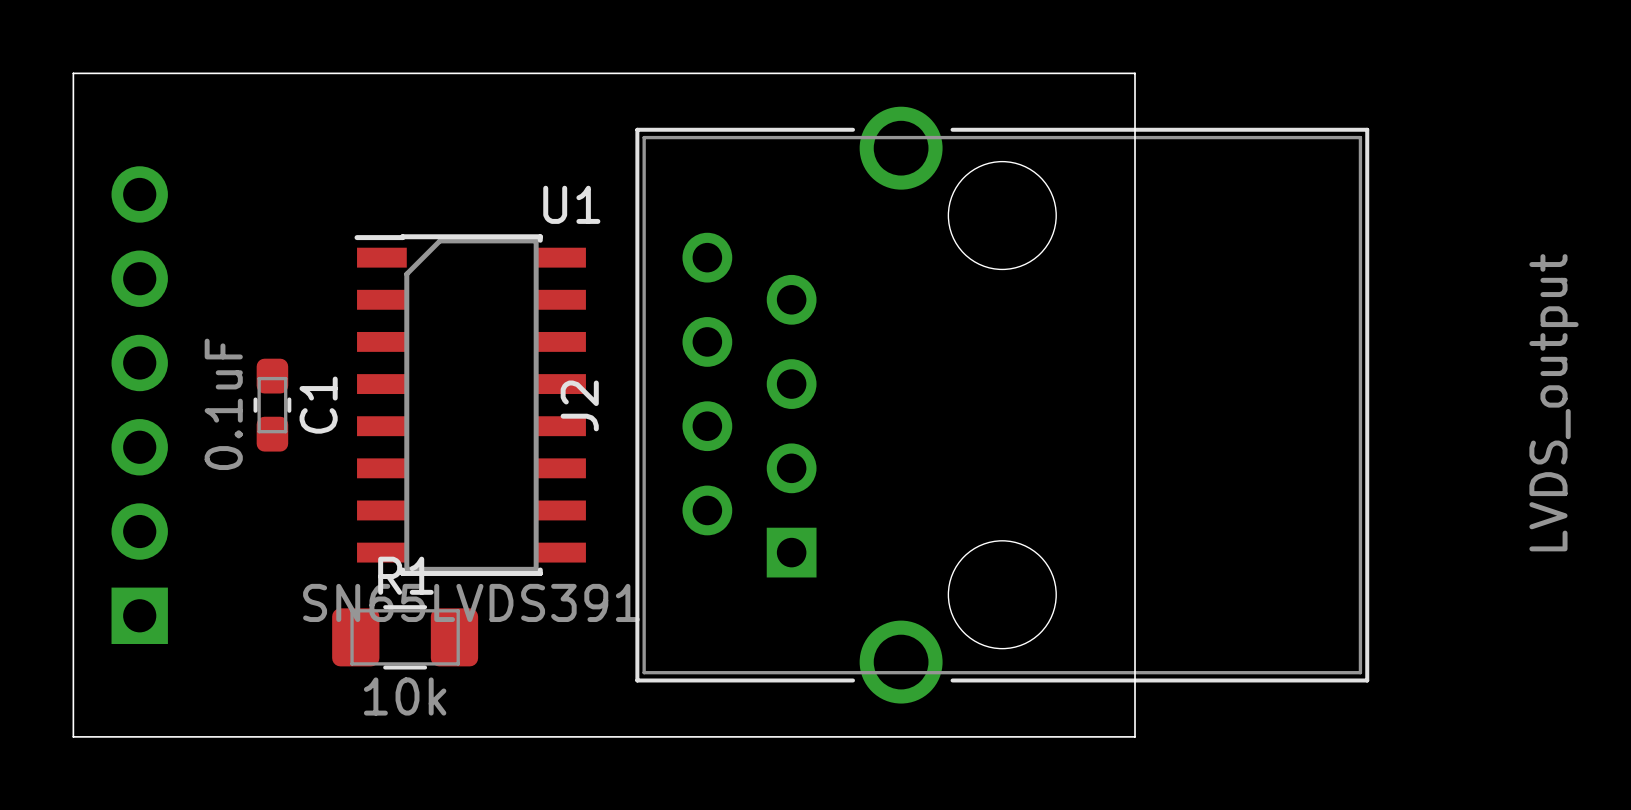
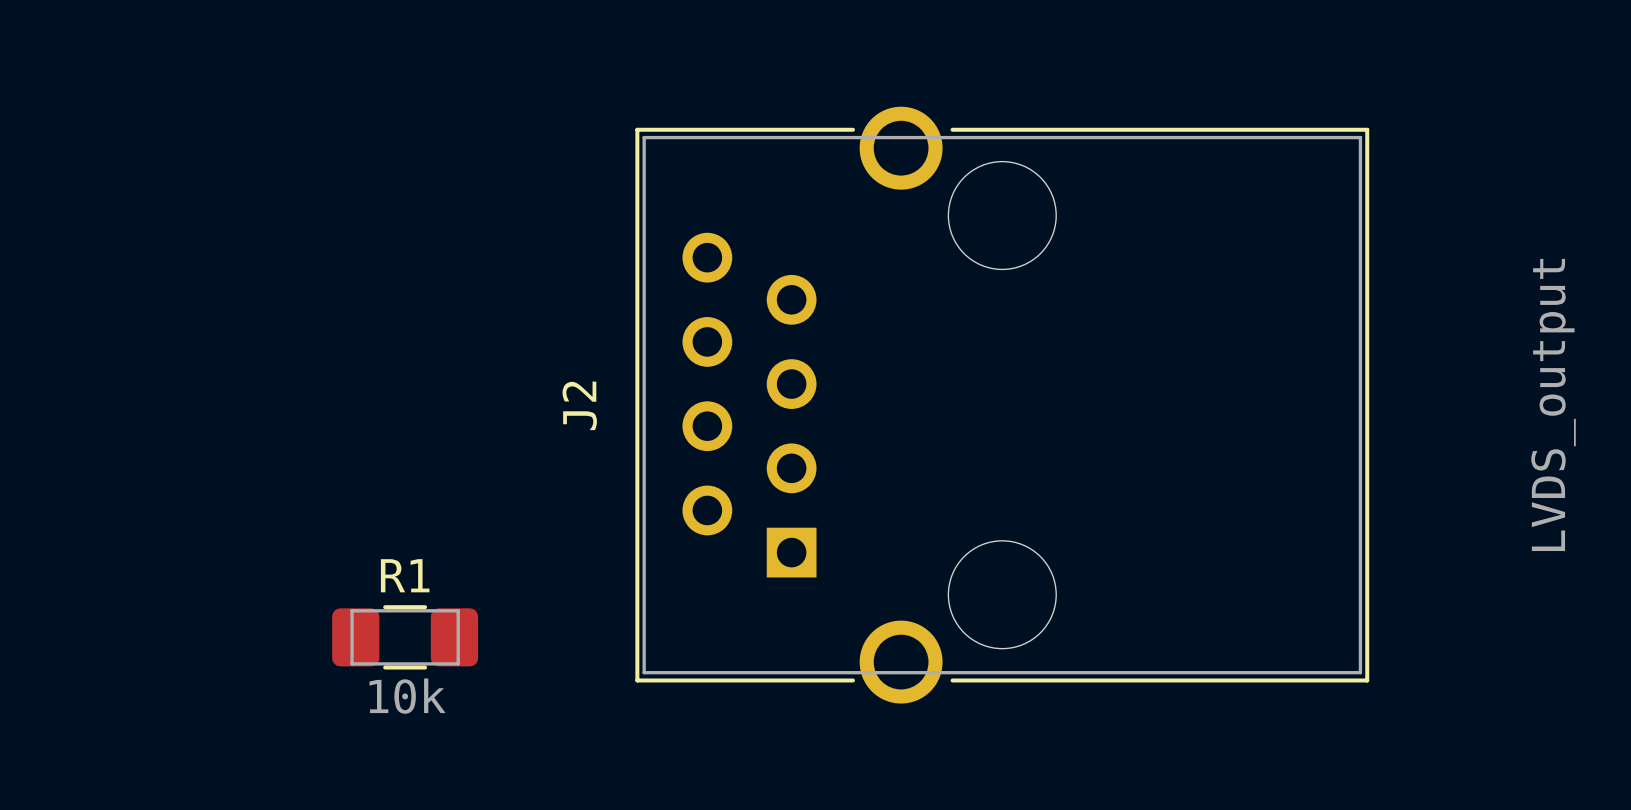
board edge: (73, 73) (73, 736) (1135, 736) (1135, 73) (73, 73) -> none
part: (139, 405) -> none
C1: 0.1uF (272, 405) -> none
U1: SN65LVDS391 (470, 405) -> none

